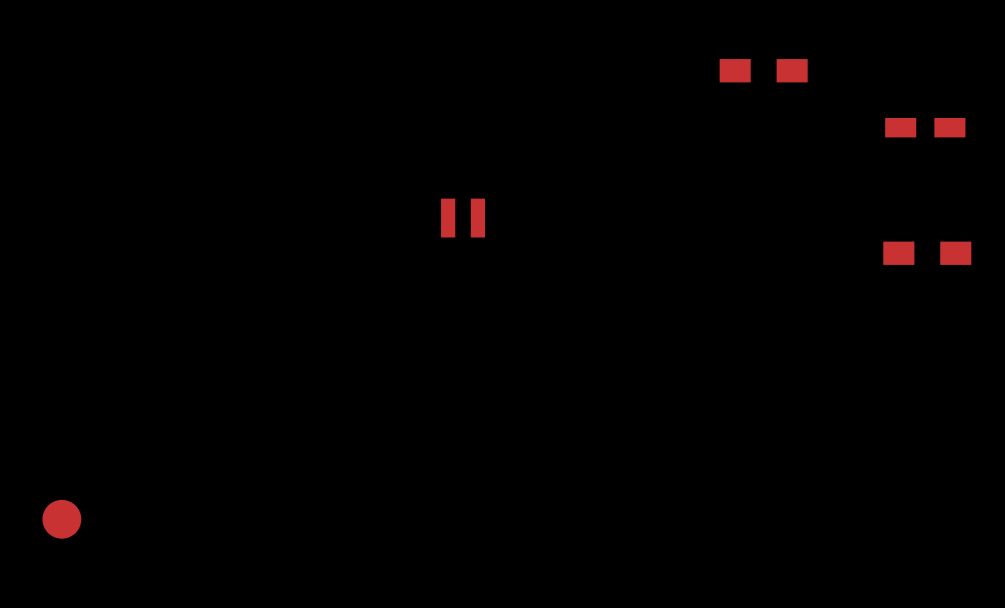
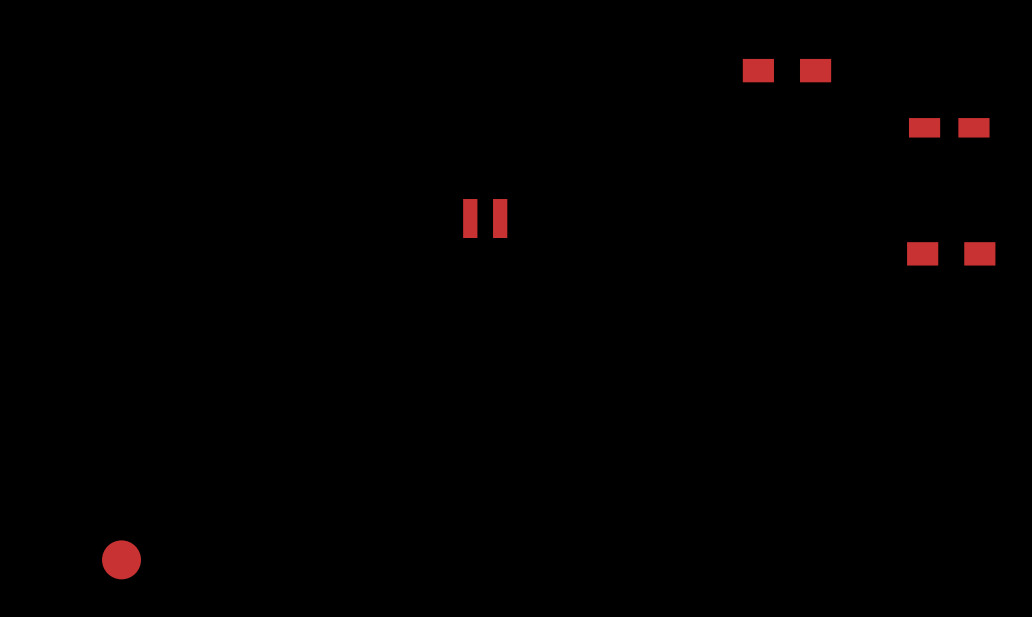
part position: (61, 519) -> (121, 559)

